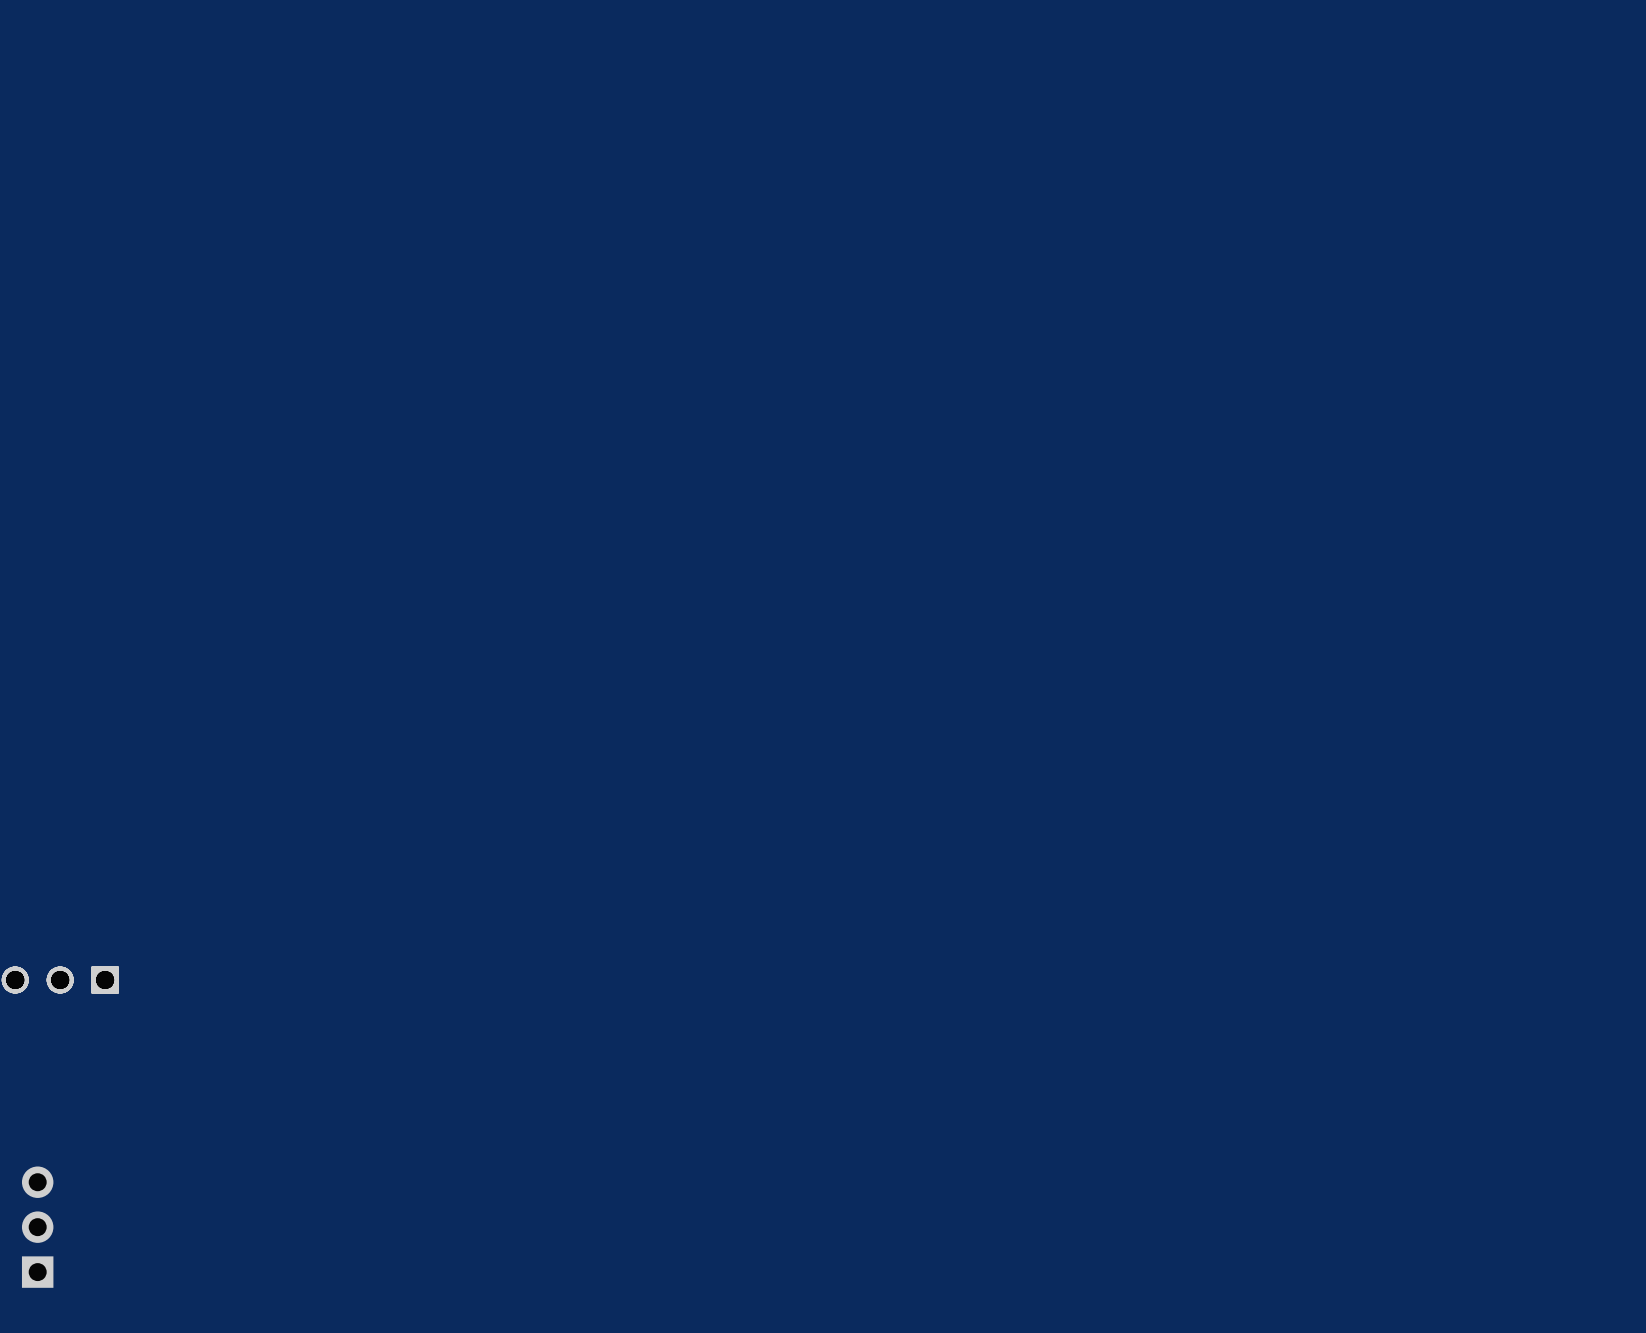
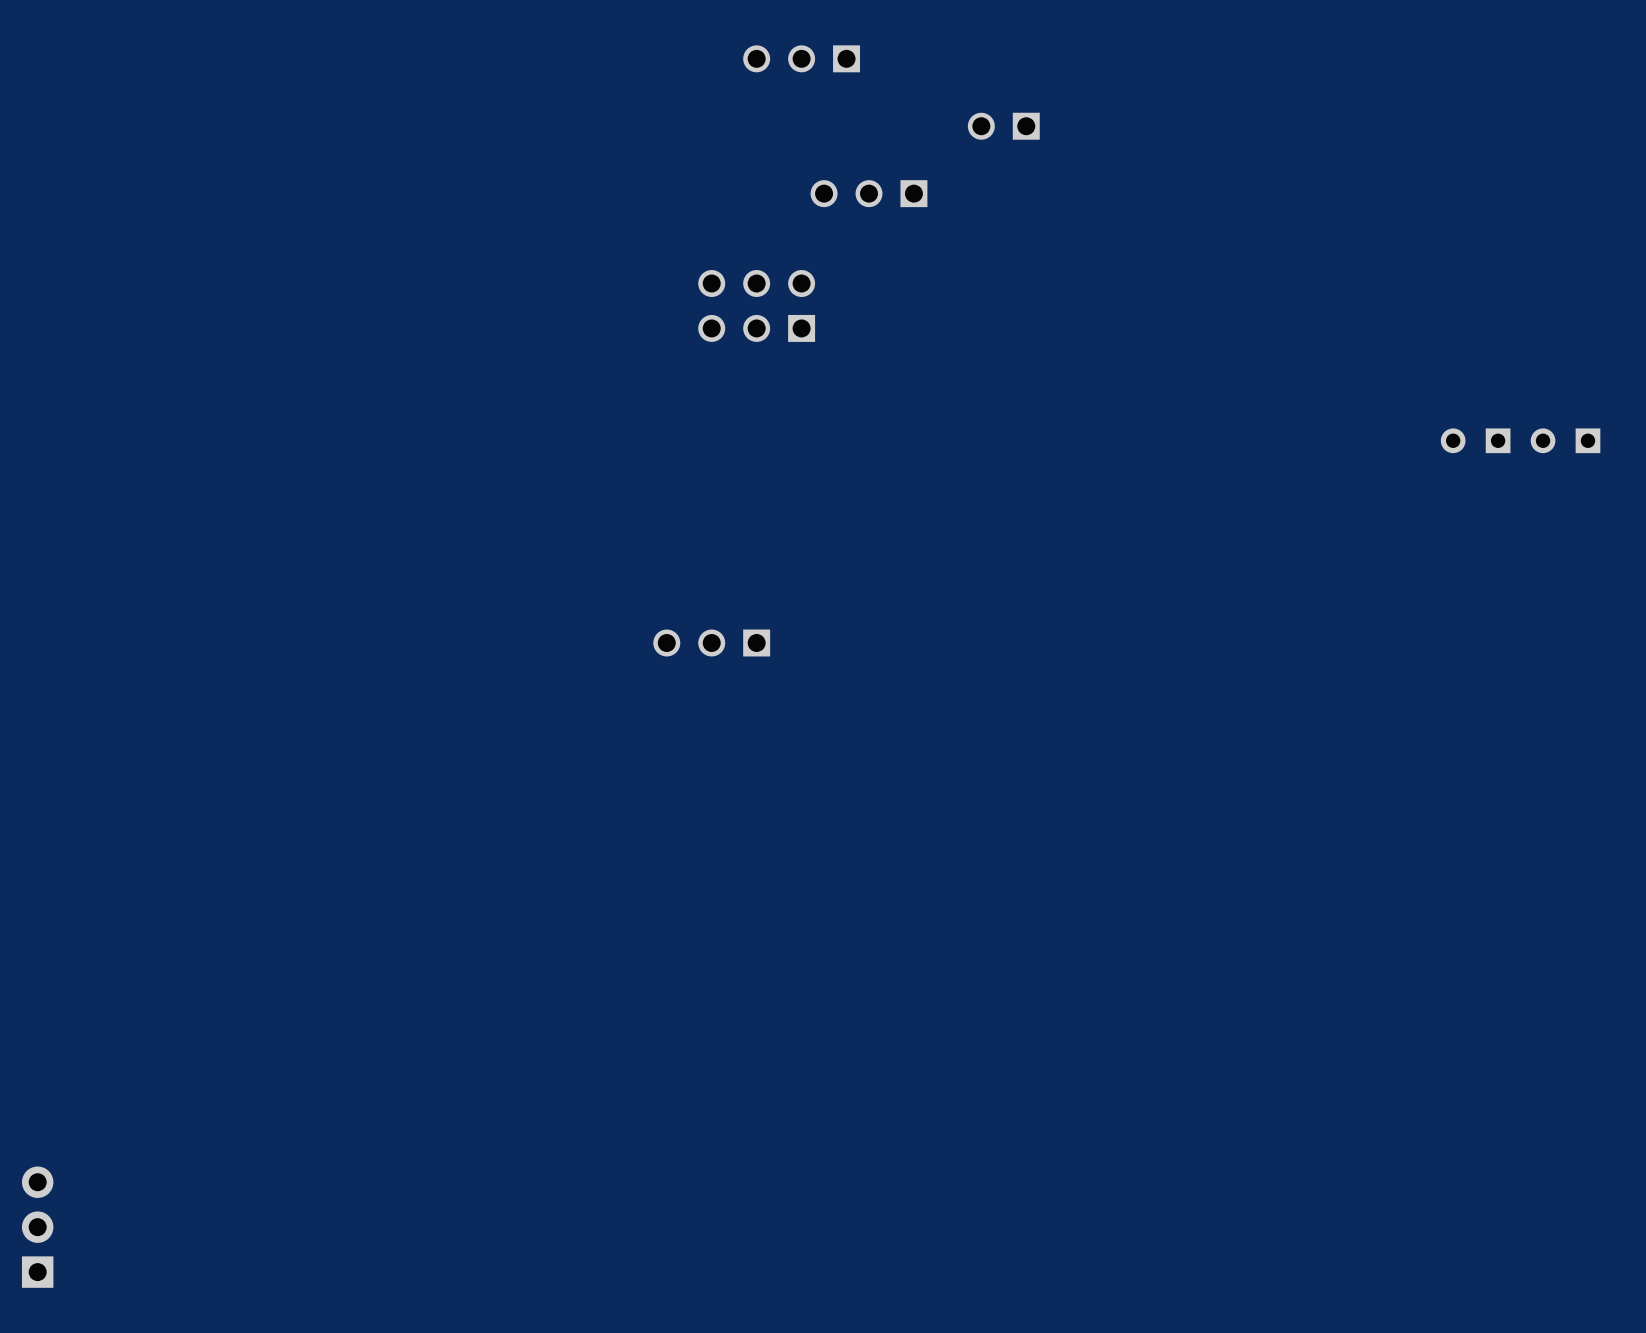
part: none -> (801, 58)
part: none -> (1003, 126)
part: none -> (869, 193)
part: none -> (756, 305)
part: none -> (1475, 440)
part: none -> (1565, 440)
part: none -> (711, 642)
part: (60, 980) -> none

